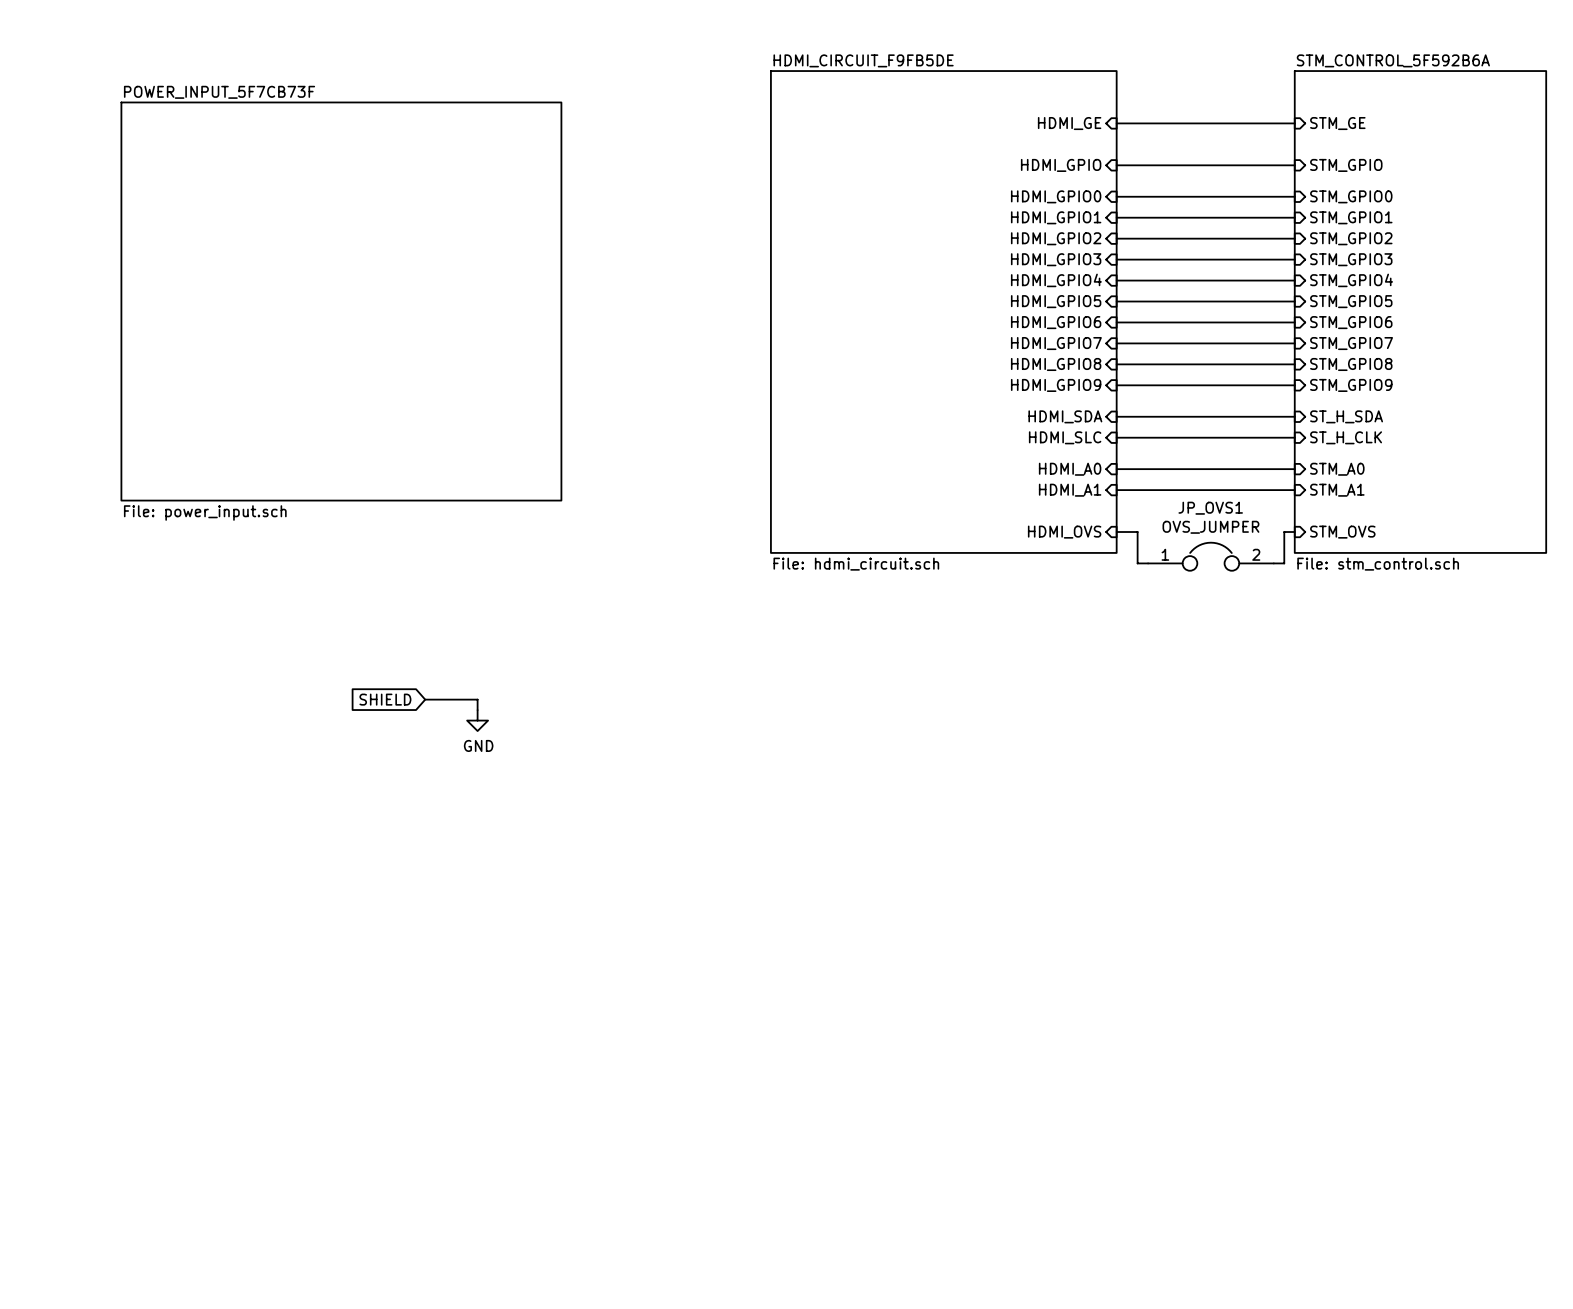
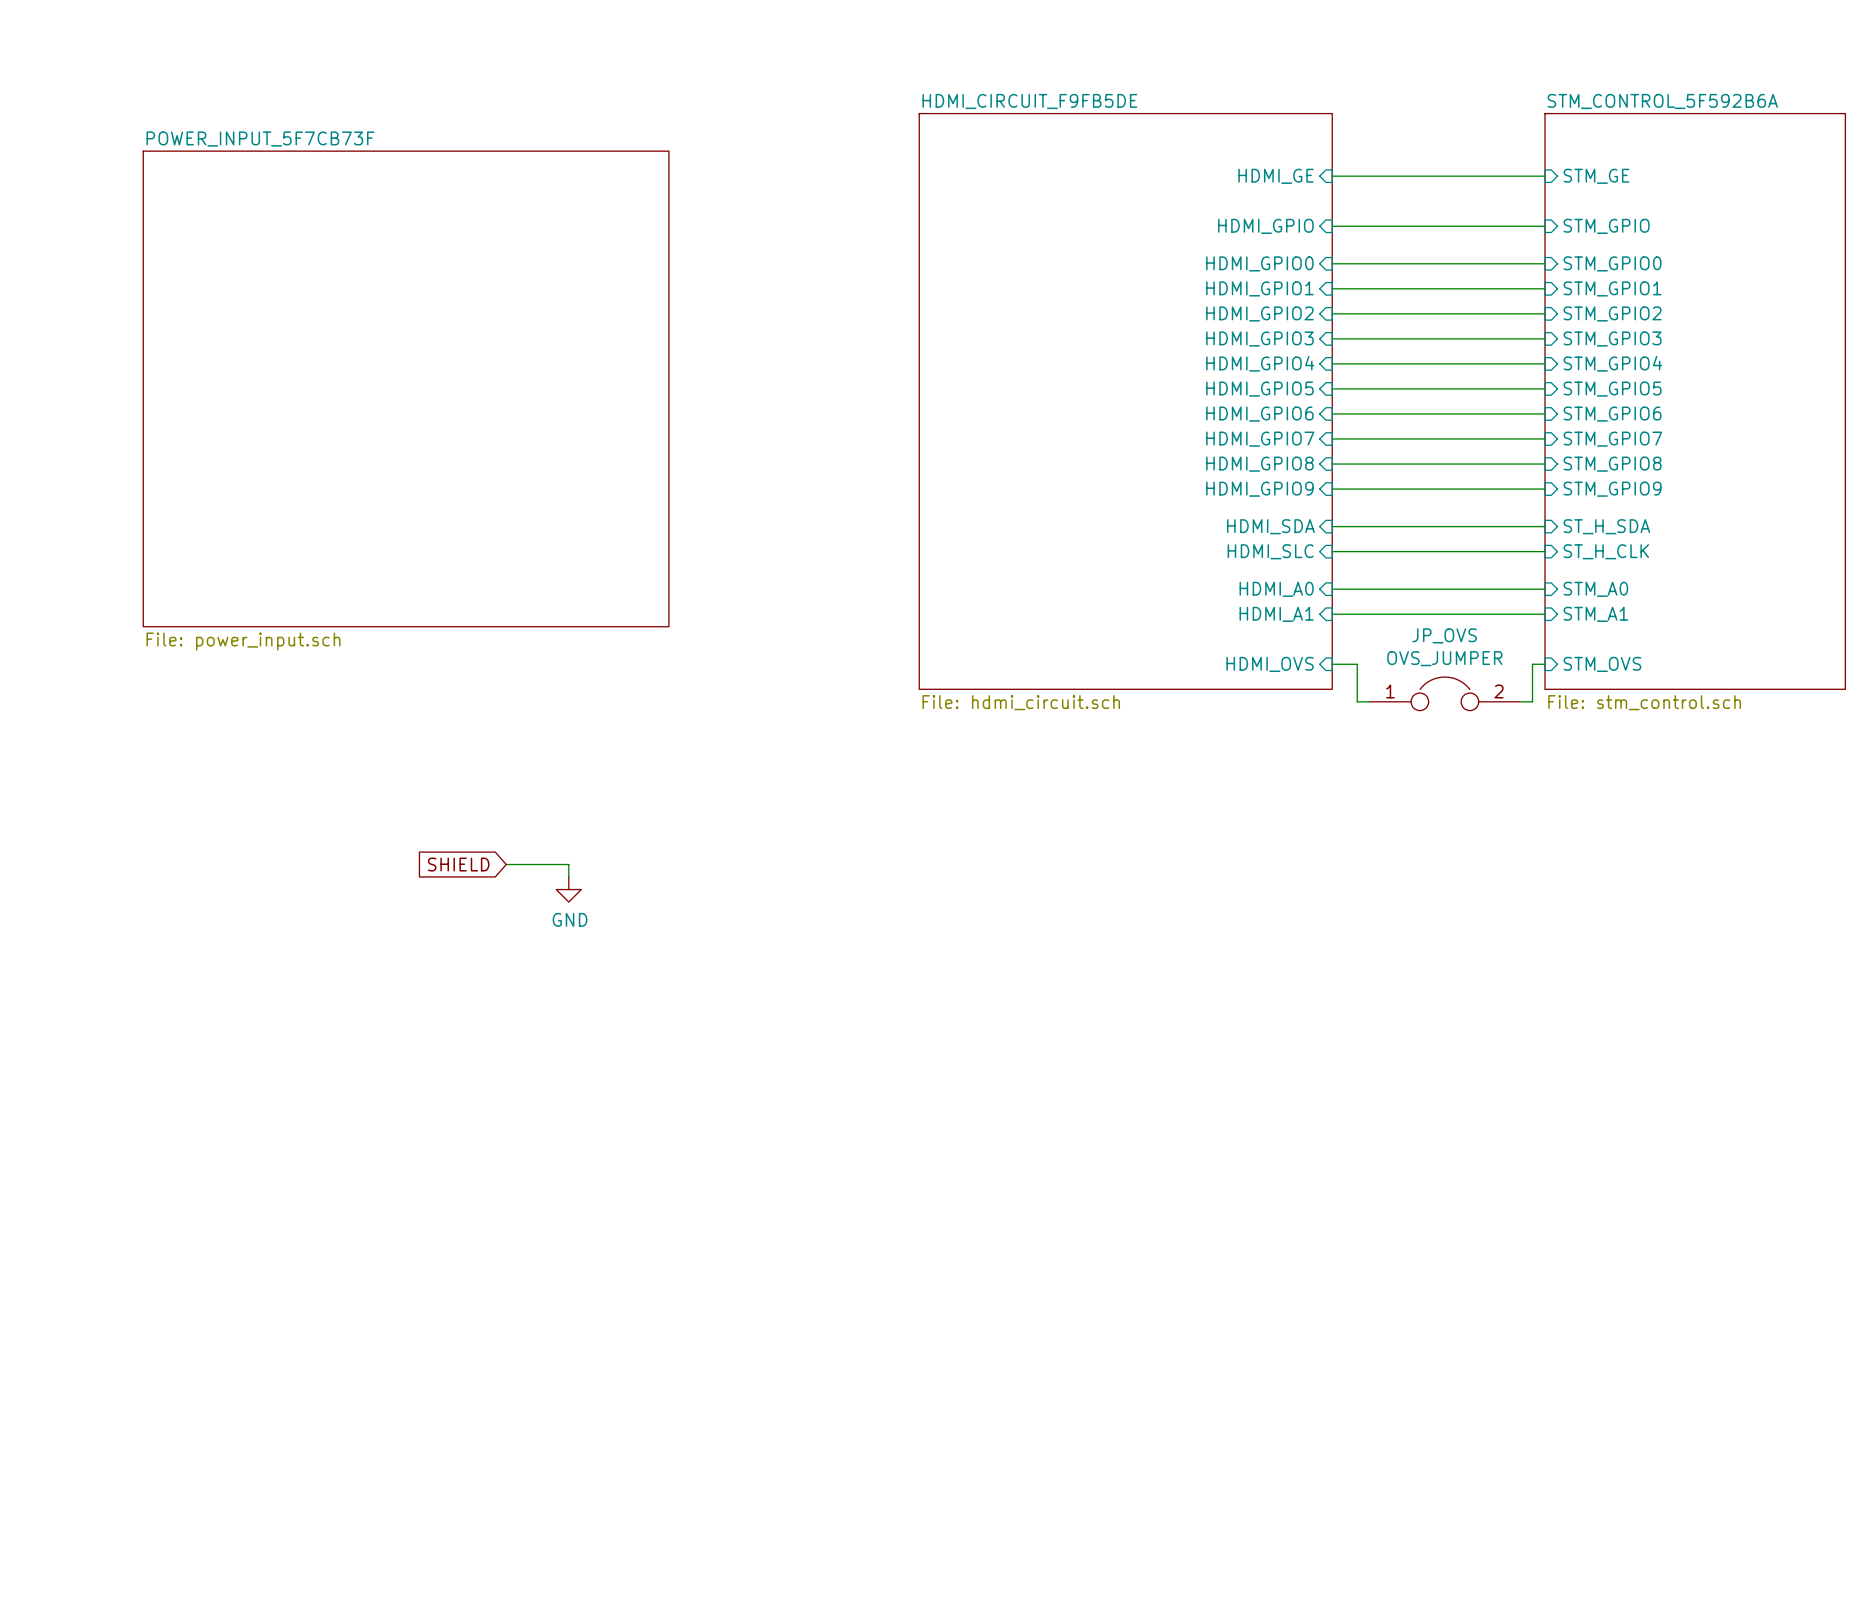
JP_OVS1 name: JP_OVS1 (1210, 508) -> JP_OVS (1444, 635)

